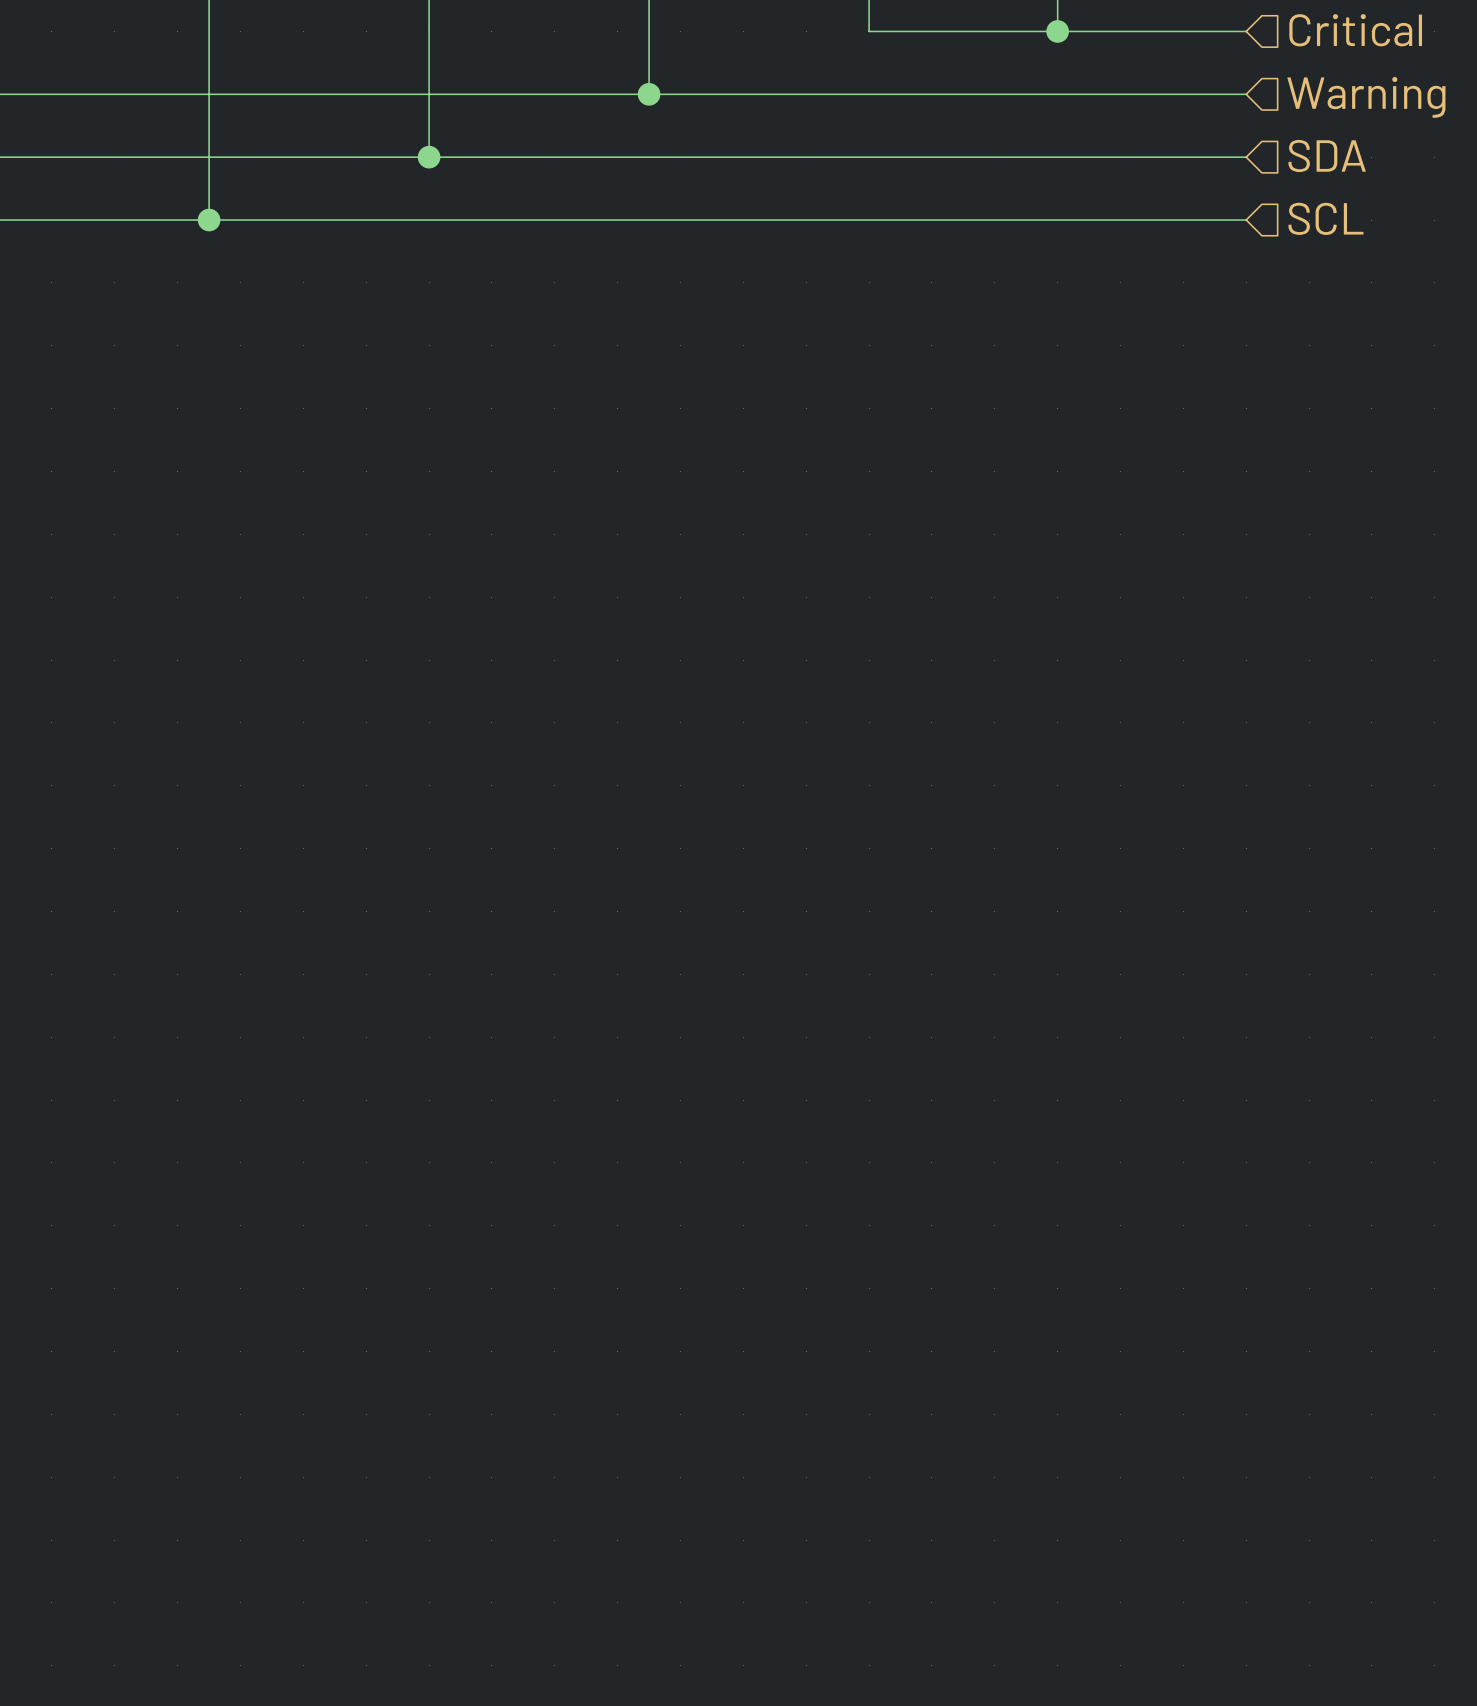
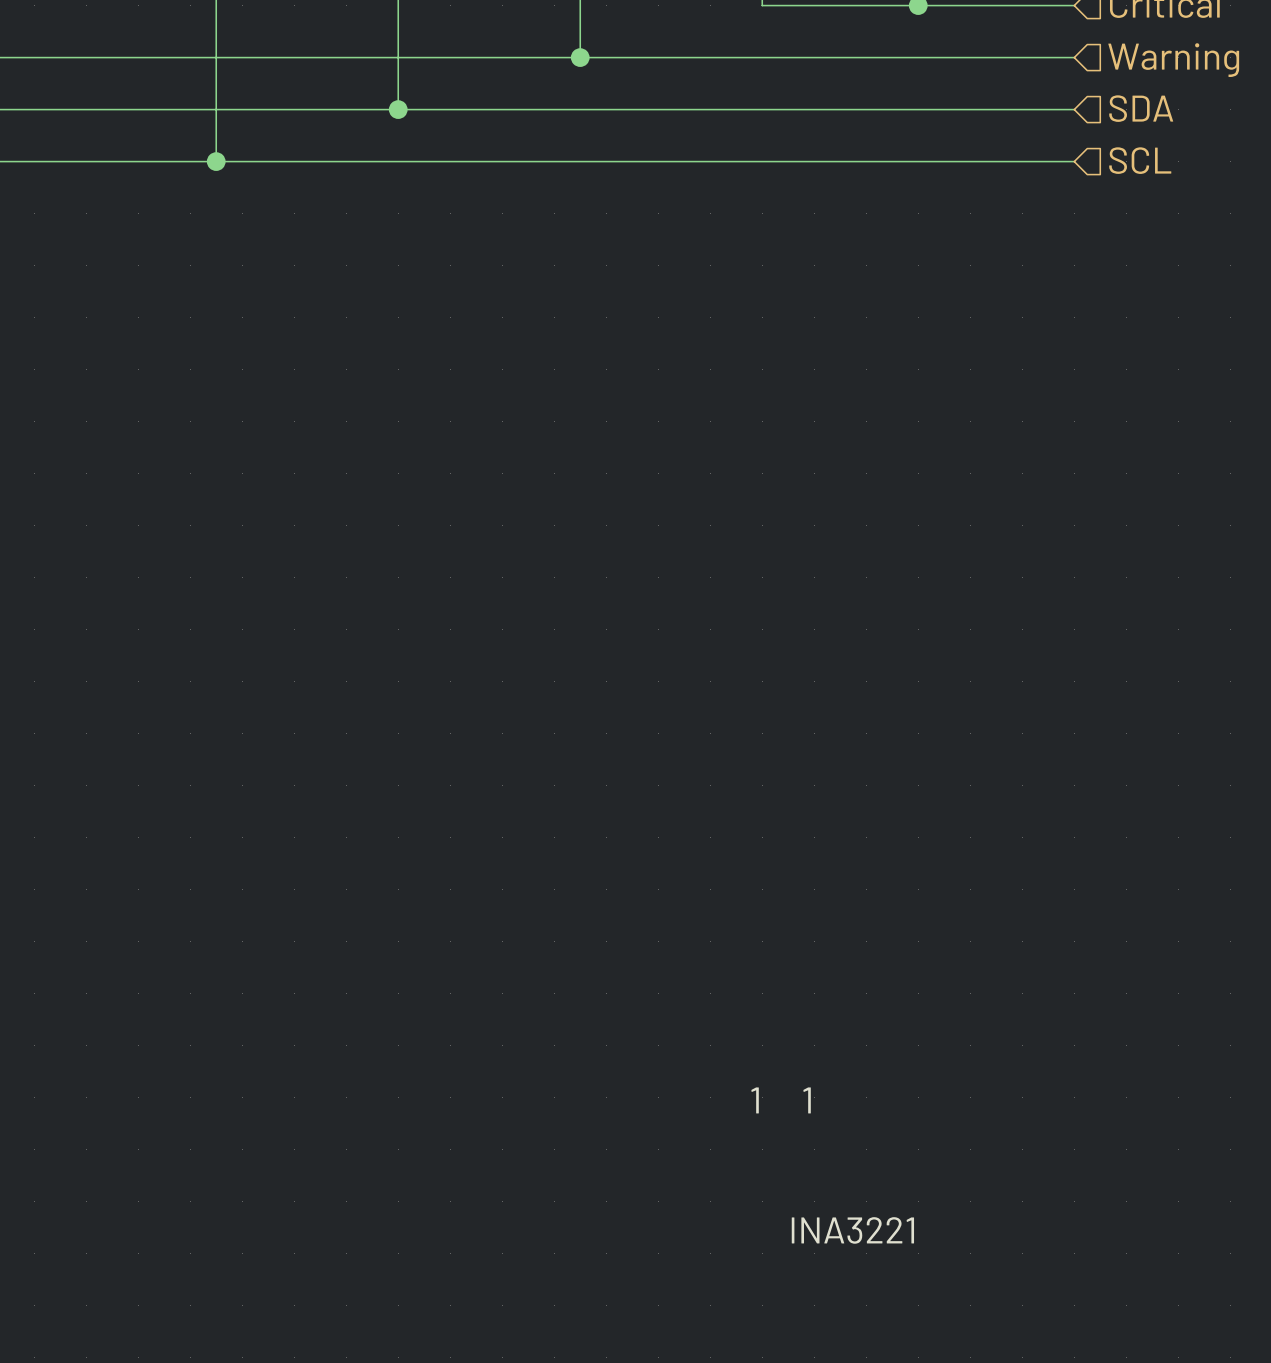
label: none -> 1 (755, 1100)
label: none -> 1 (807, 1100)
label: none -> INA3221 (852, 1230)

